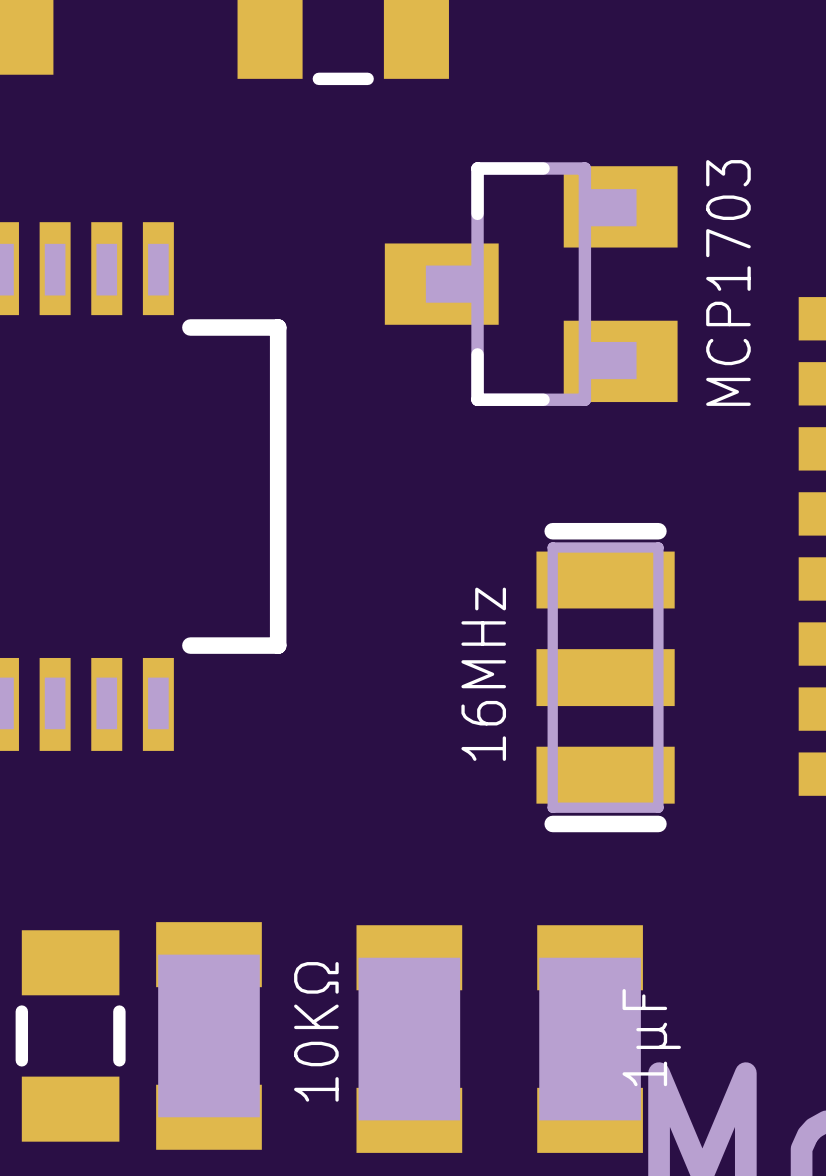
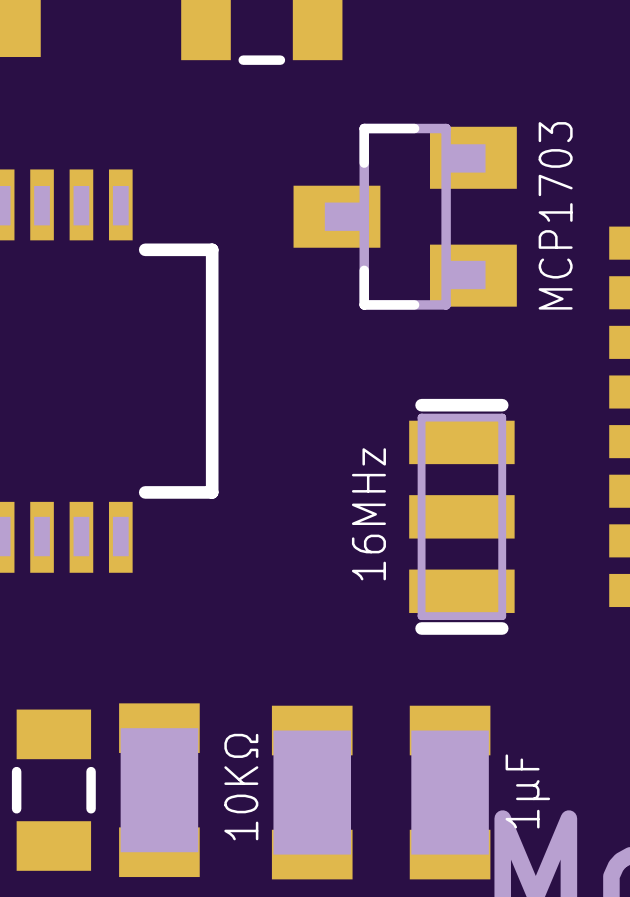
text position: 1μF (651, 1037) -> 1μF (527, 791)

